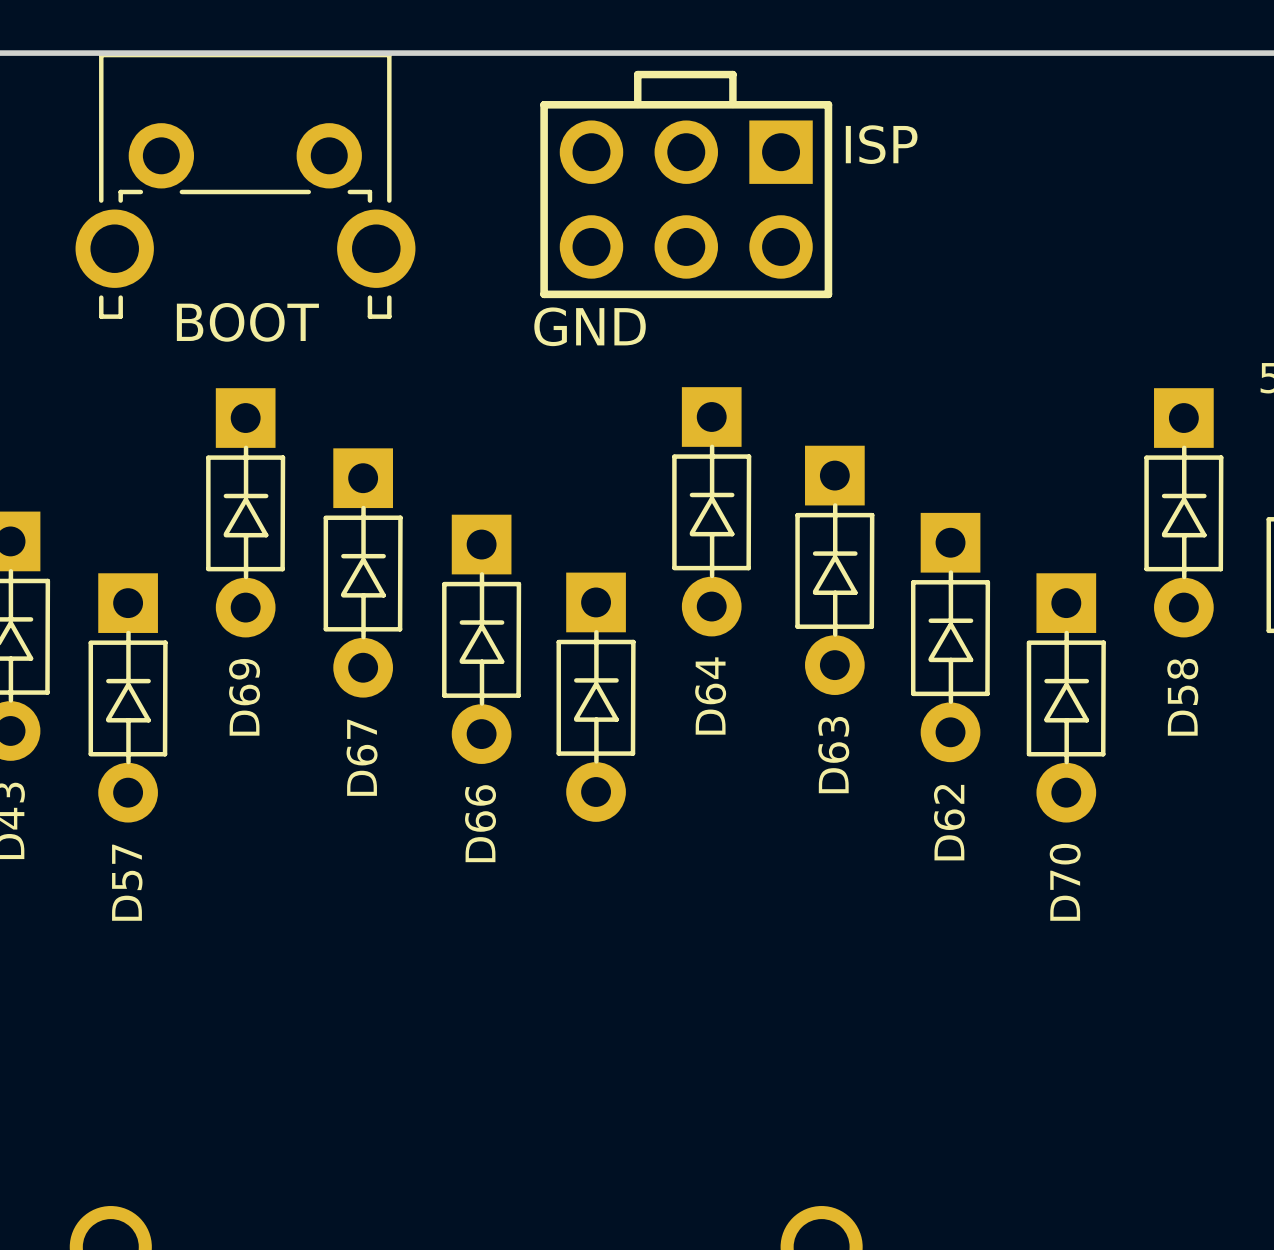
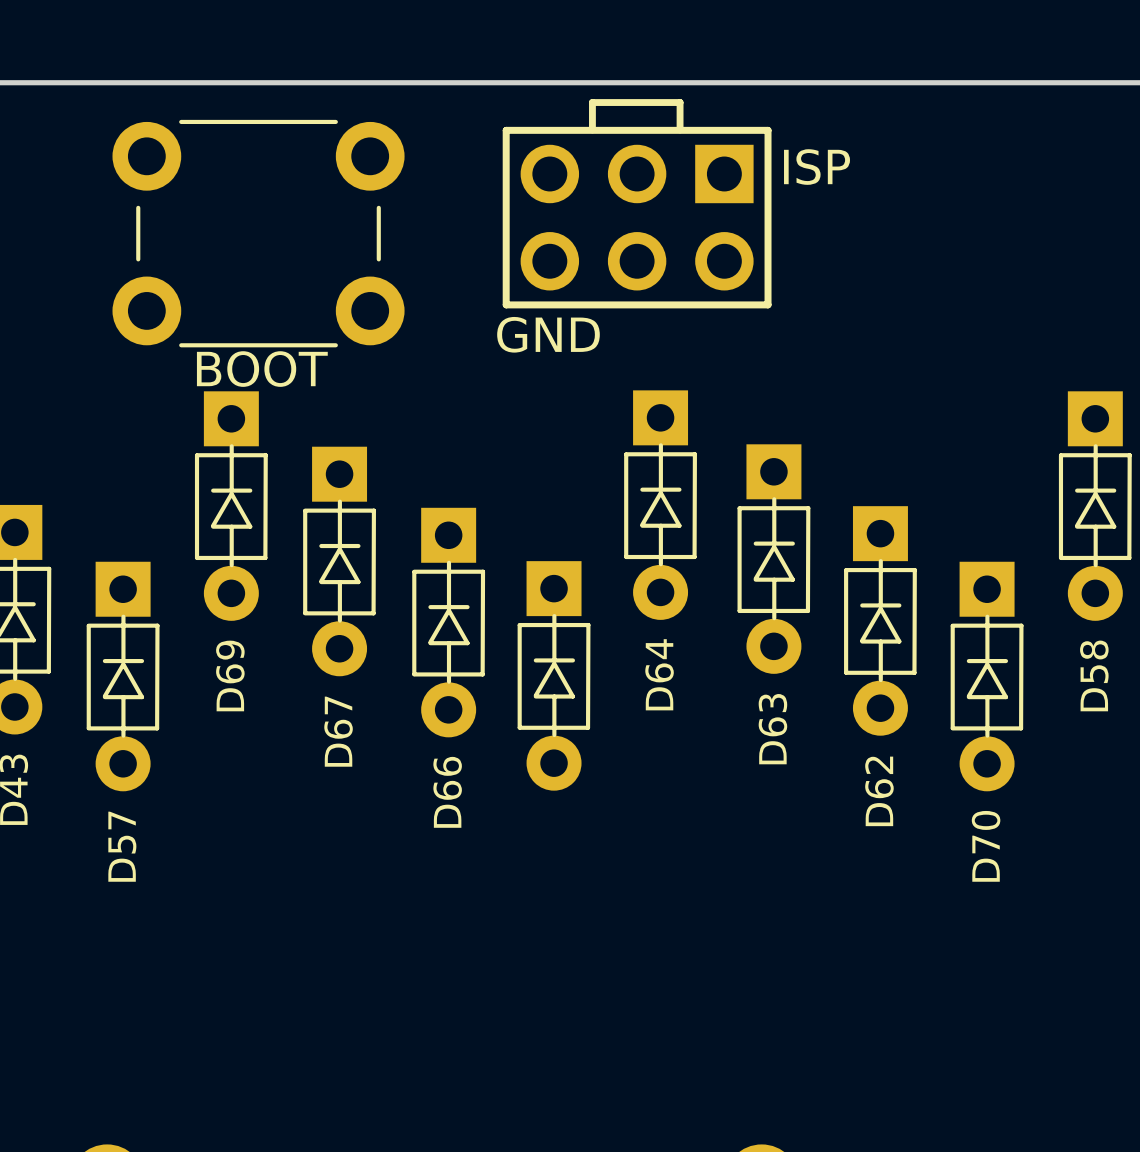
part: (245, 185) -> none
part: none -> BOOT (258, 233)
text: BOOT (247, 322) -> none

